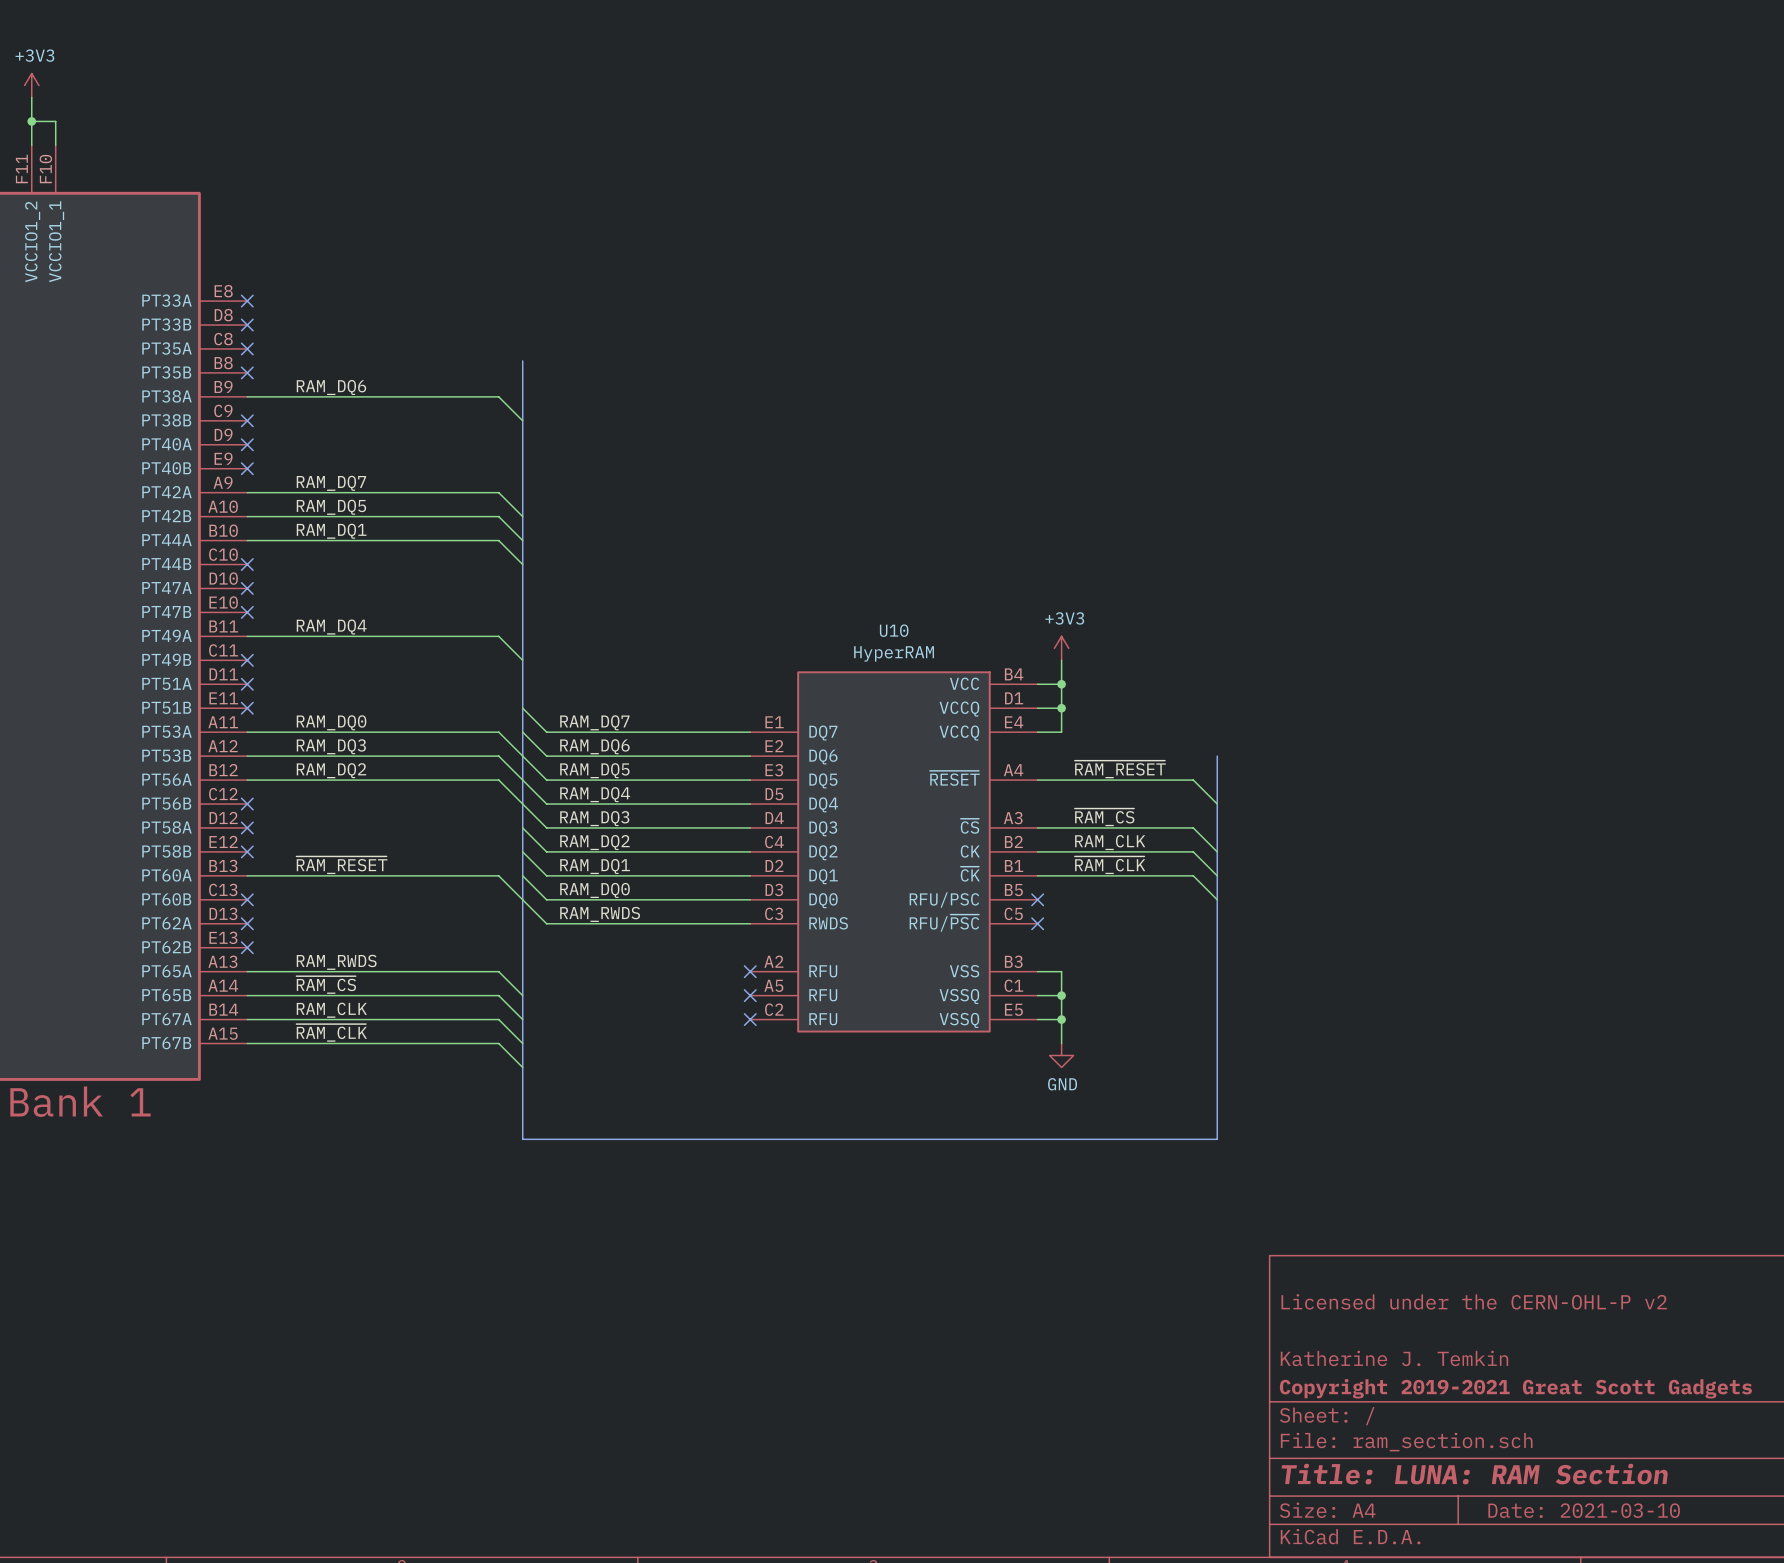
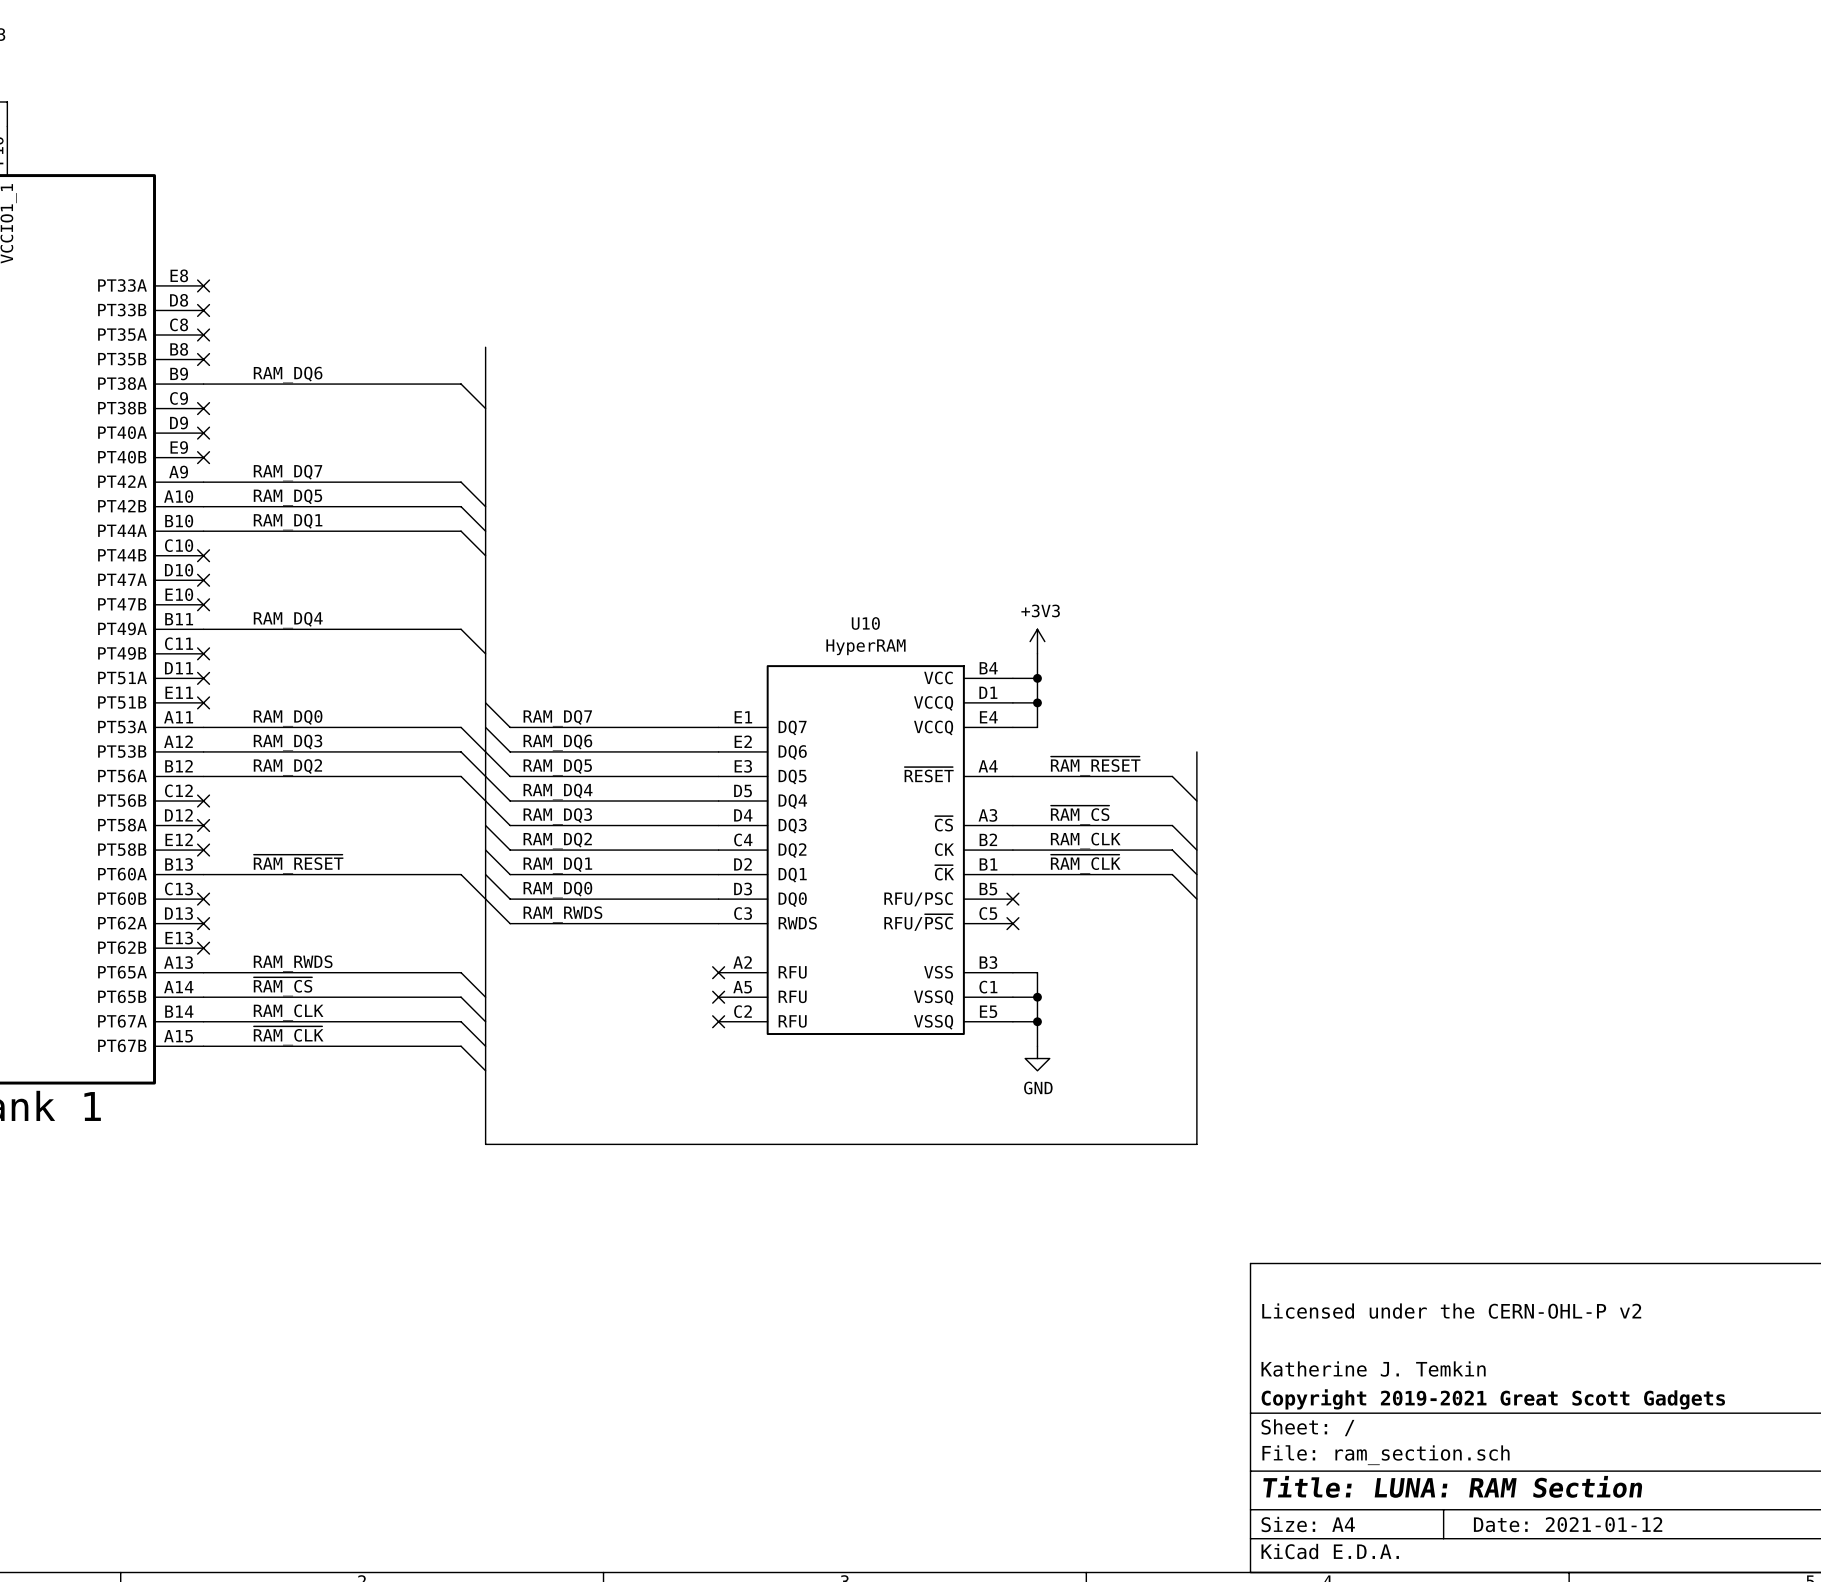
title block: Date: 2021-03-10 (1584, 1510) -> Date: 2021-01-12 (1568, 1524)

